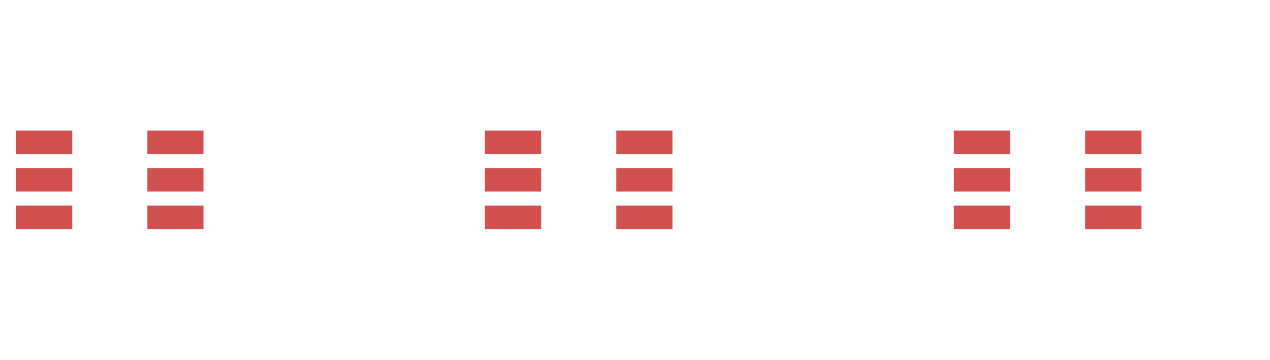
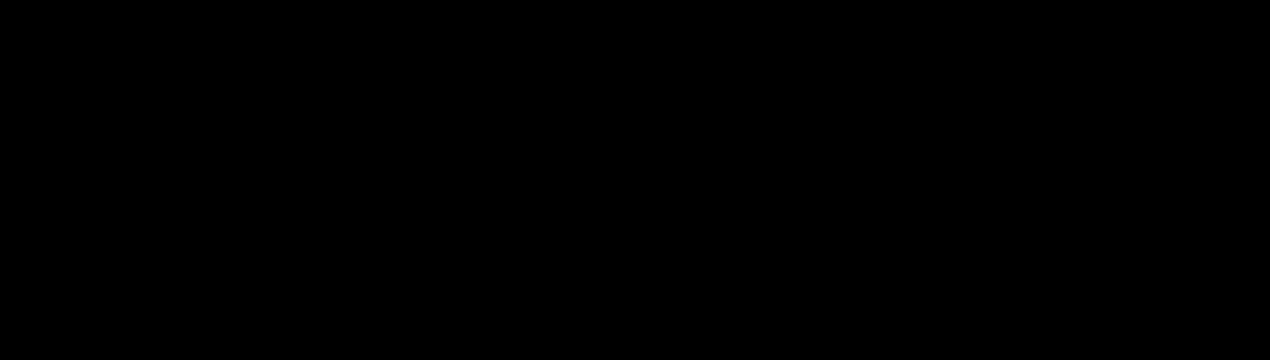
part: (109, 179) -> none
part: (578, 179) -> none
part: (1047, 179) -> none

